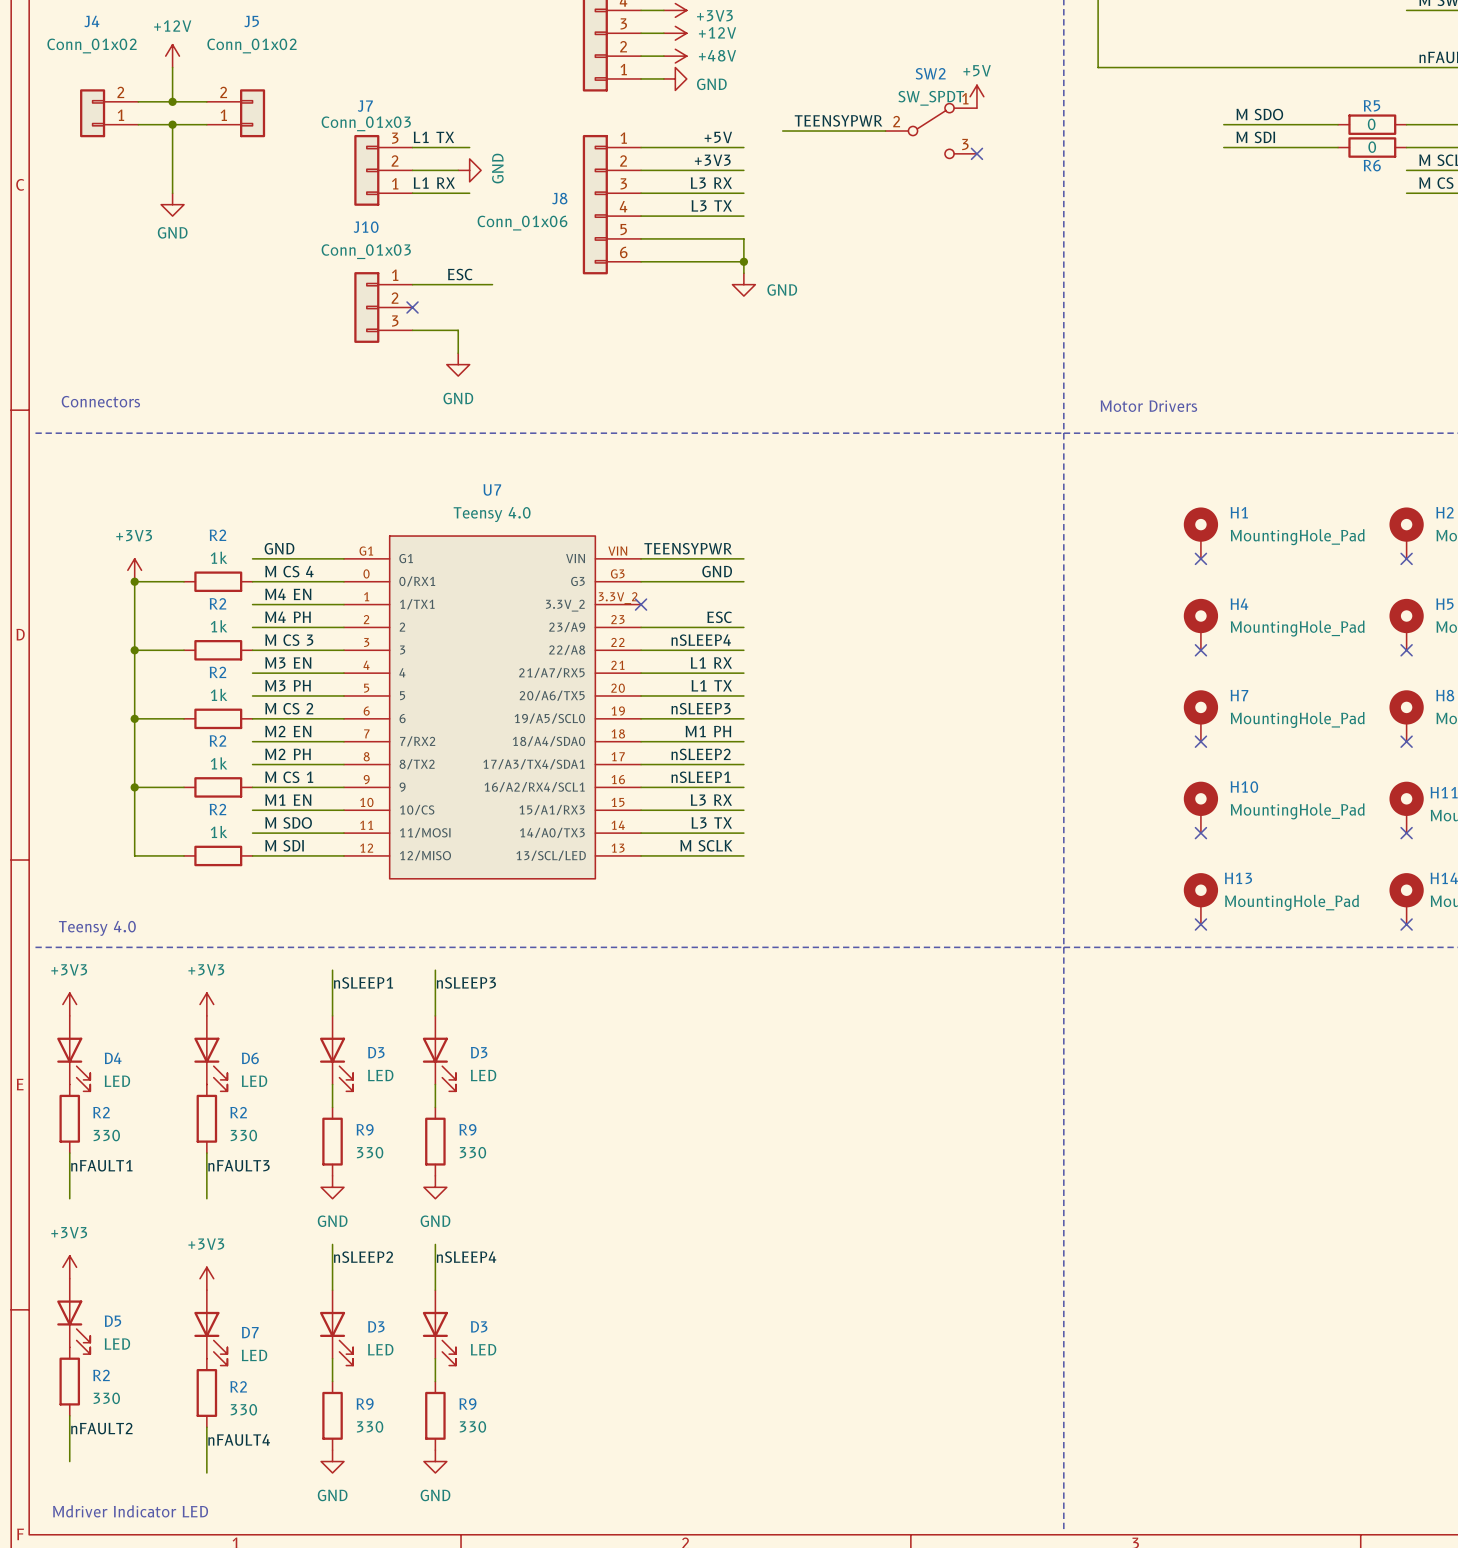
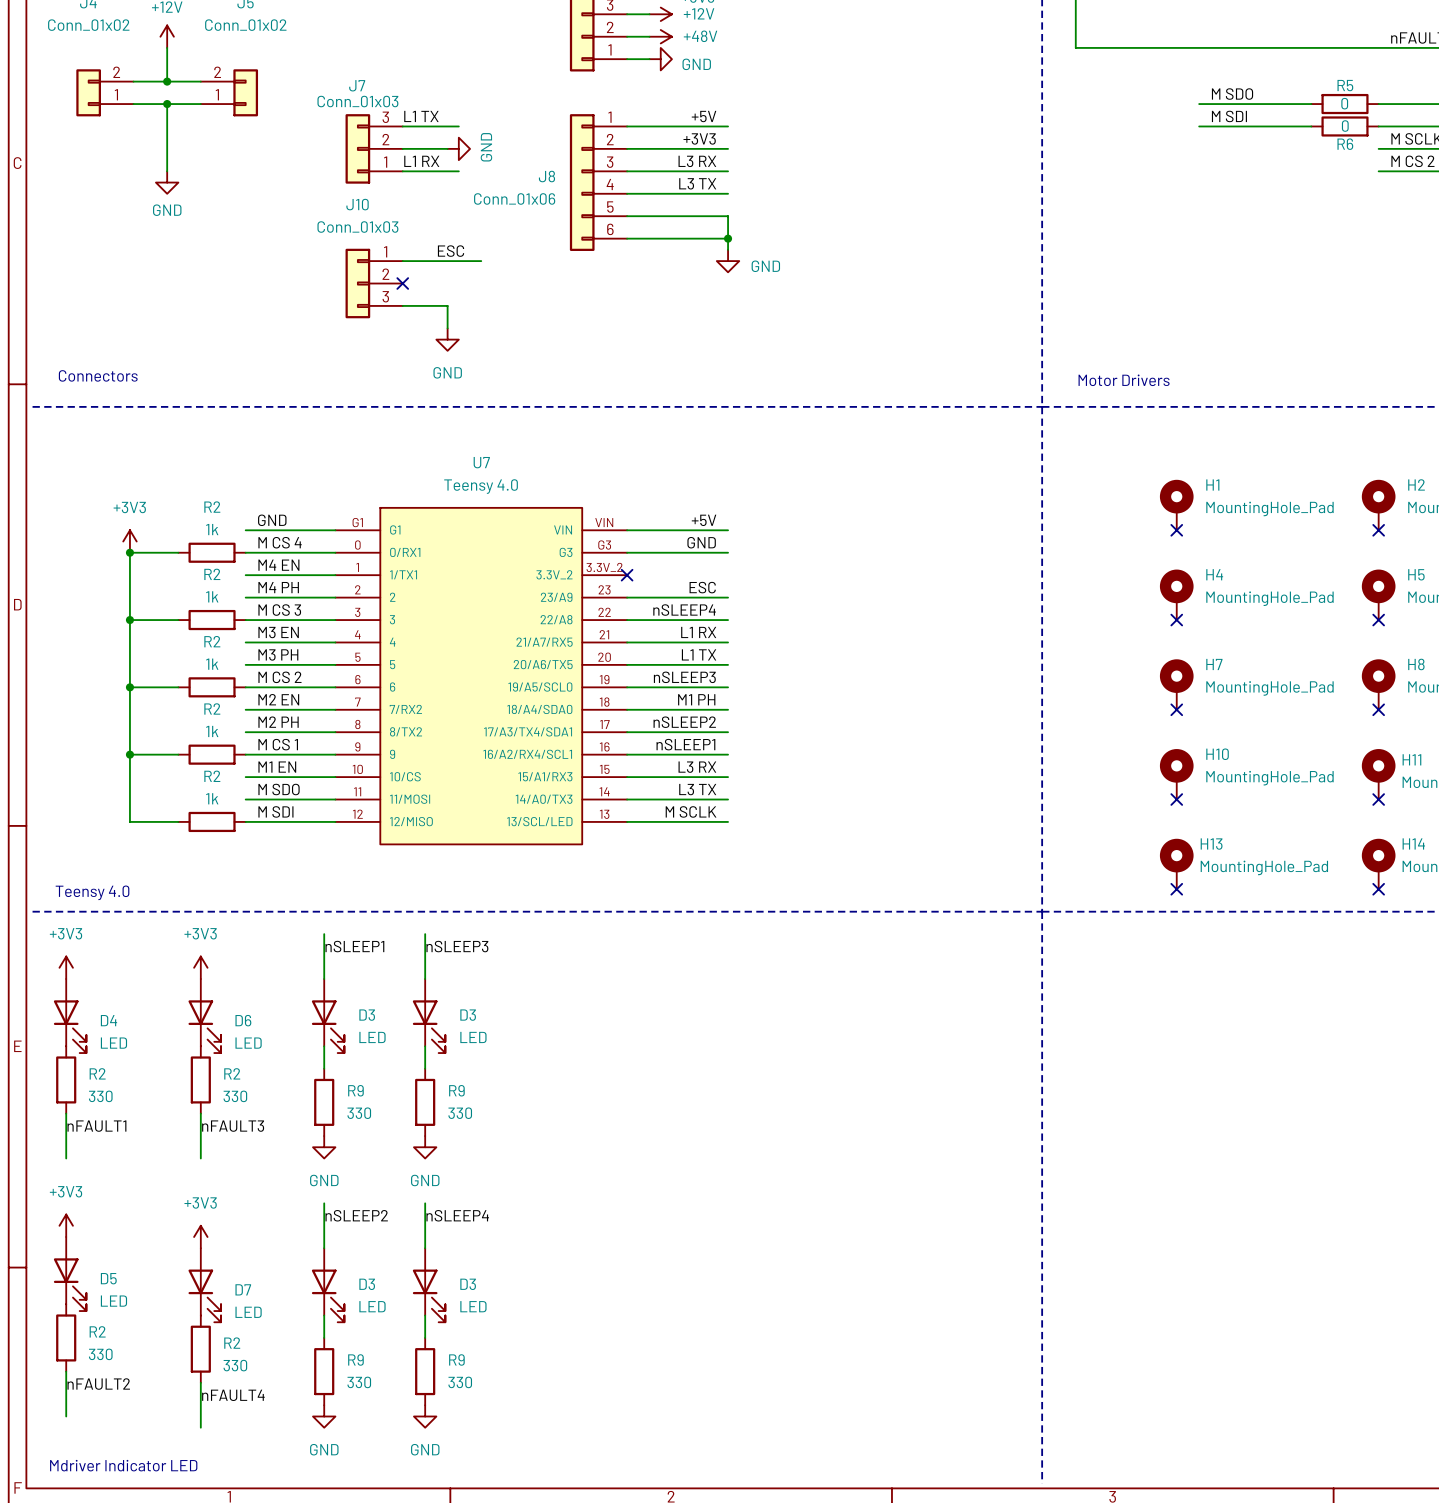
power symbol: +5V (976, 96) -> none
label: TEENSYPWR (838, 120) -> none
wire: (782, 131) (885, 131) -> none
SW2: SW_SPDT (931, 131) -> none
no-connect mark: (976, 153) -> none
label: TEENSYPWR (688, 548) -> +5V (704, 520)

